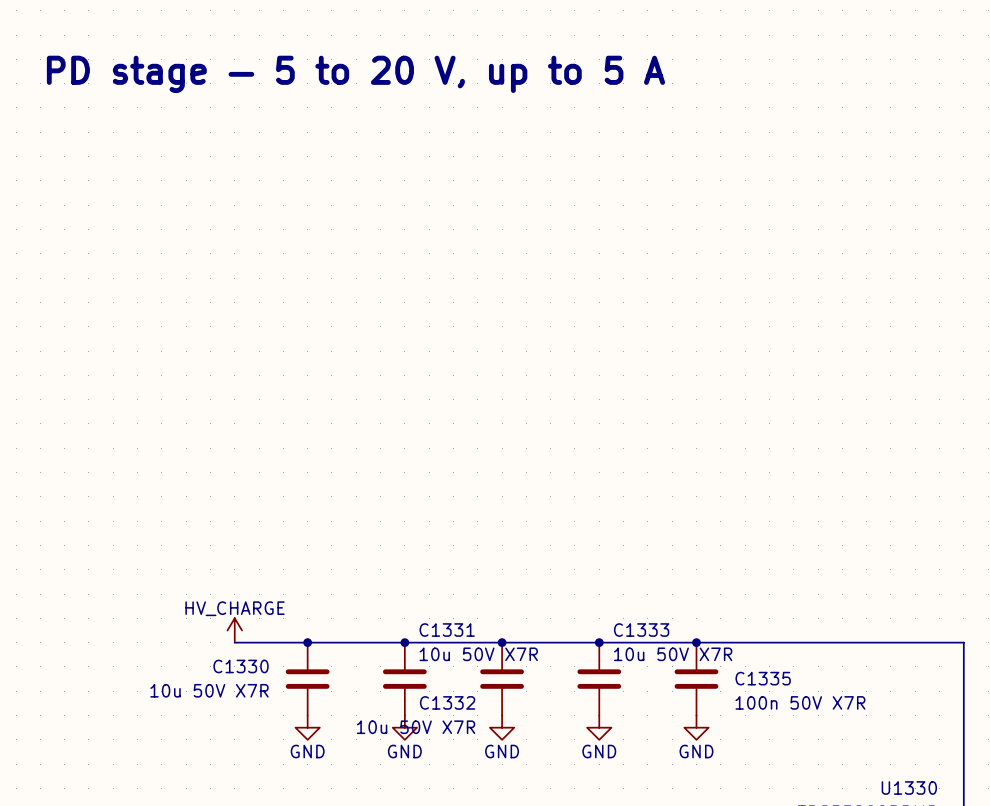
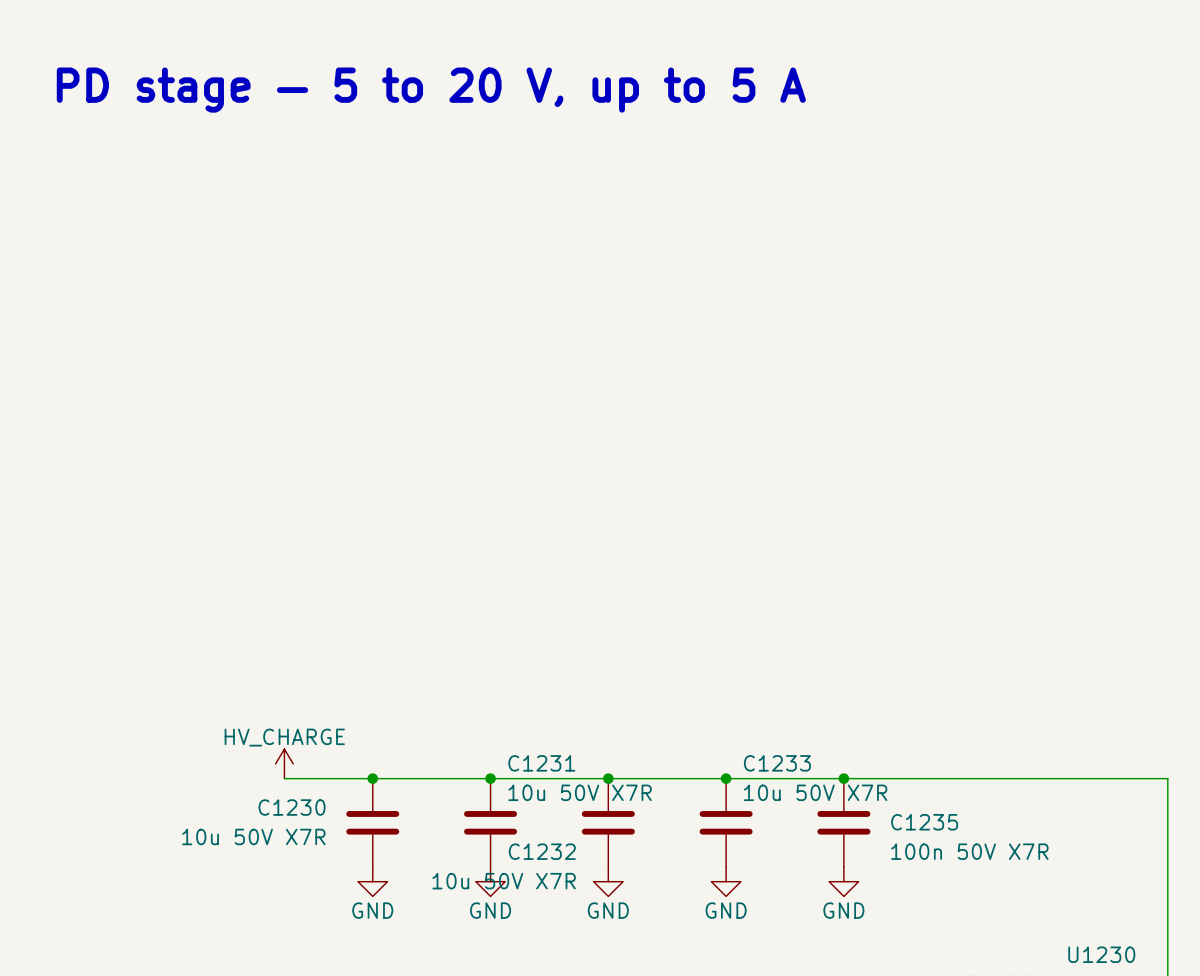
C1331 name: C1331 (447, 630) -> C1231 (541, 763)
C1333 name: C1333 (641, 630) -> C1233 (777, 763)
C1330 name: C1330 (241, 666) -> C1230 (292, 807)
C1335 name: C1335 (763, 678) -> C1235 (924, 822)
C1332 name: C1332 (447, 702) -> C1232 (542, 851)
U1330 name: U1330 (909, 787) -> U1230 (1101, 954)

